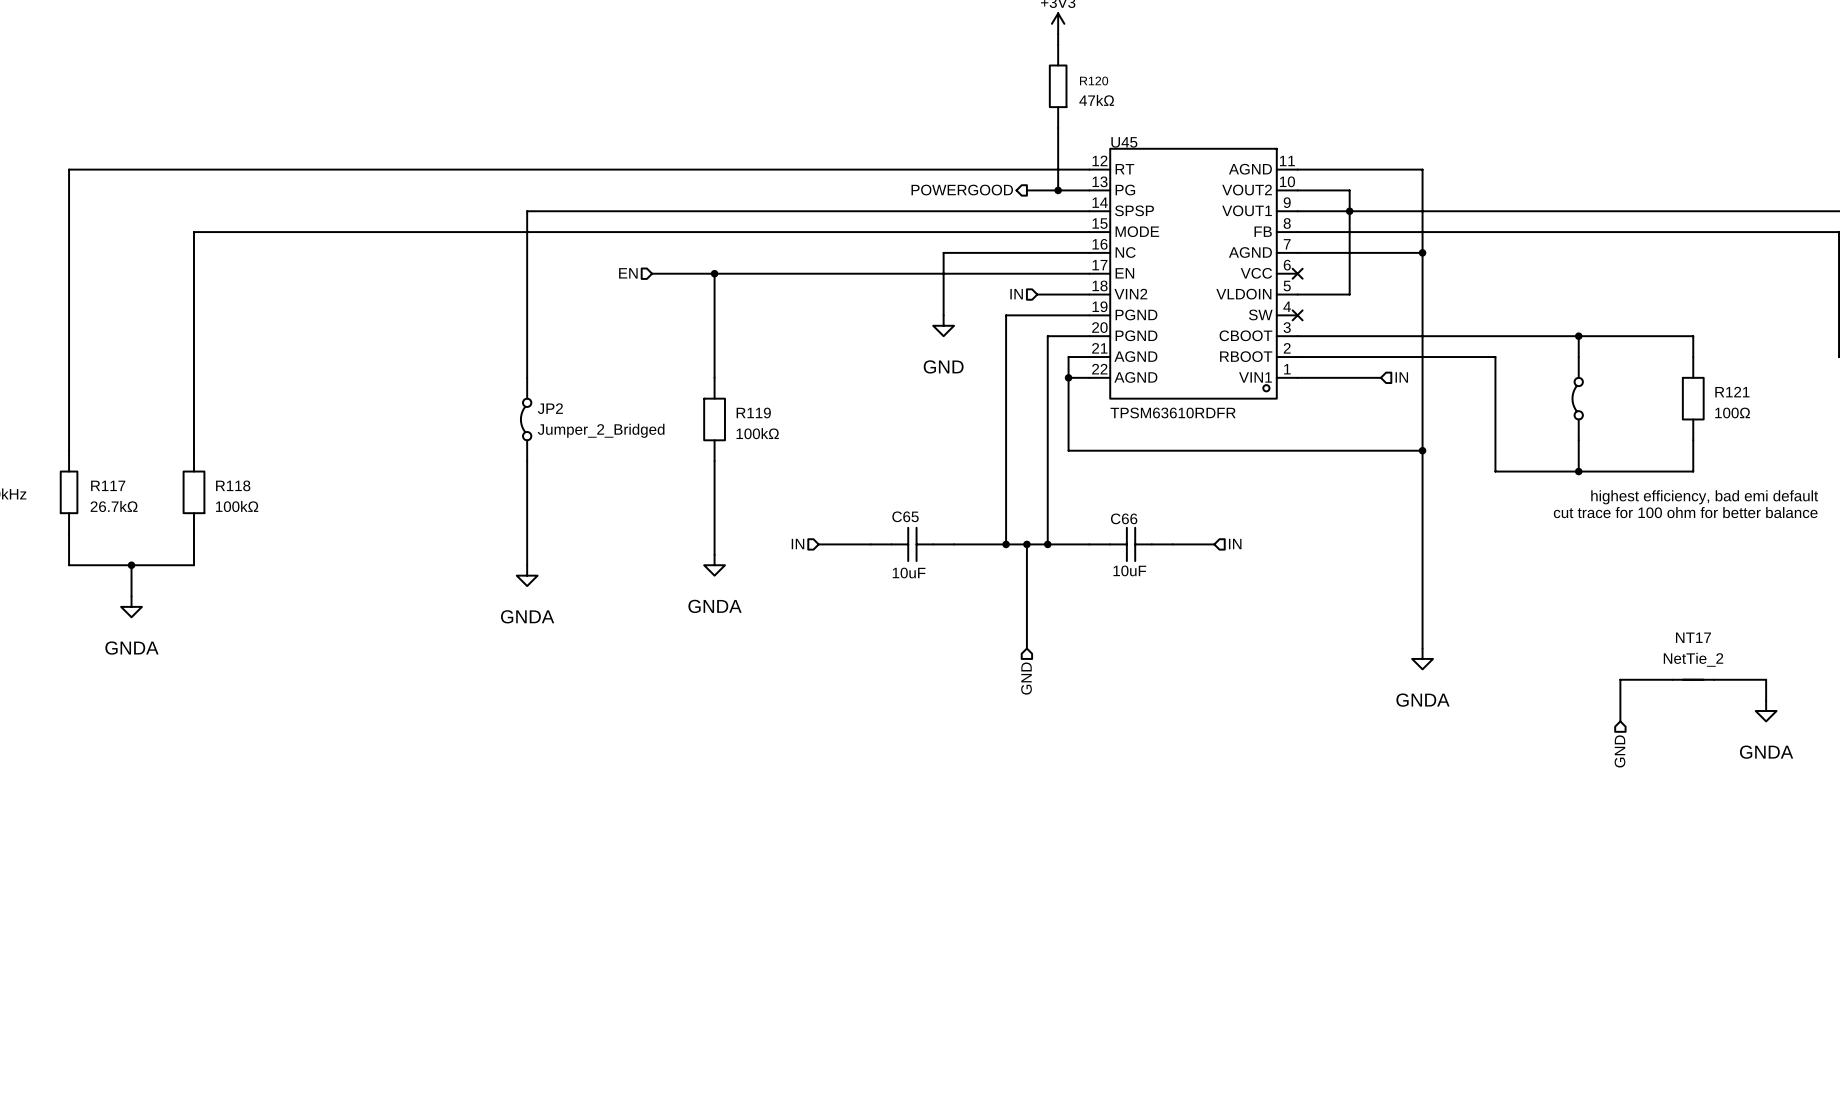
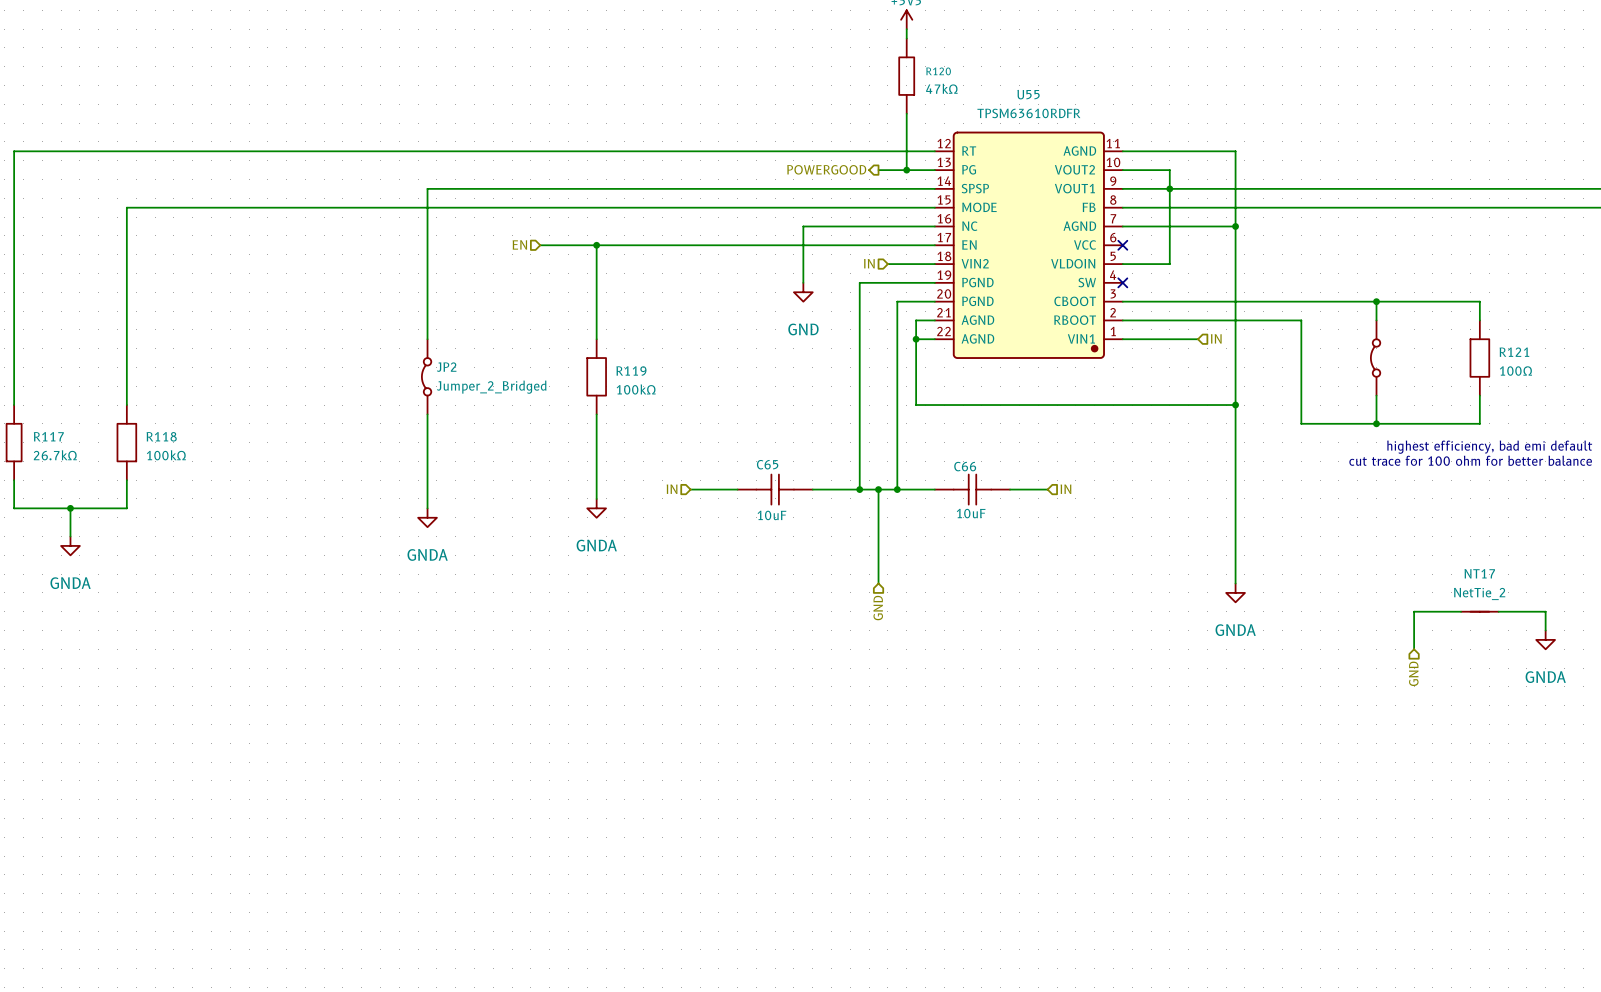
U45: TPSM63610RDFR (1193, 273) -> none
U55: none -> TPSM63610RDFR (1028, 245)

